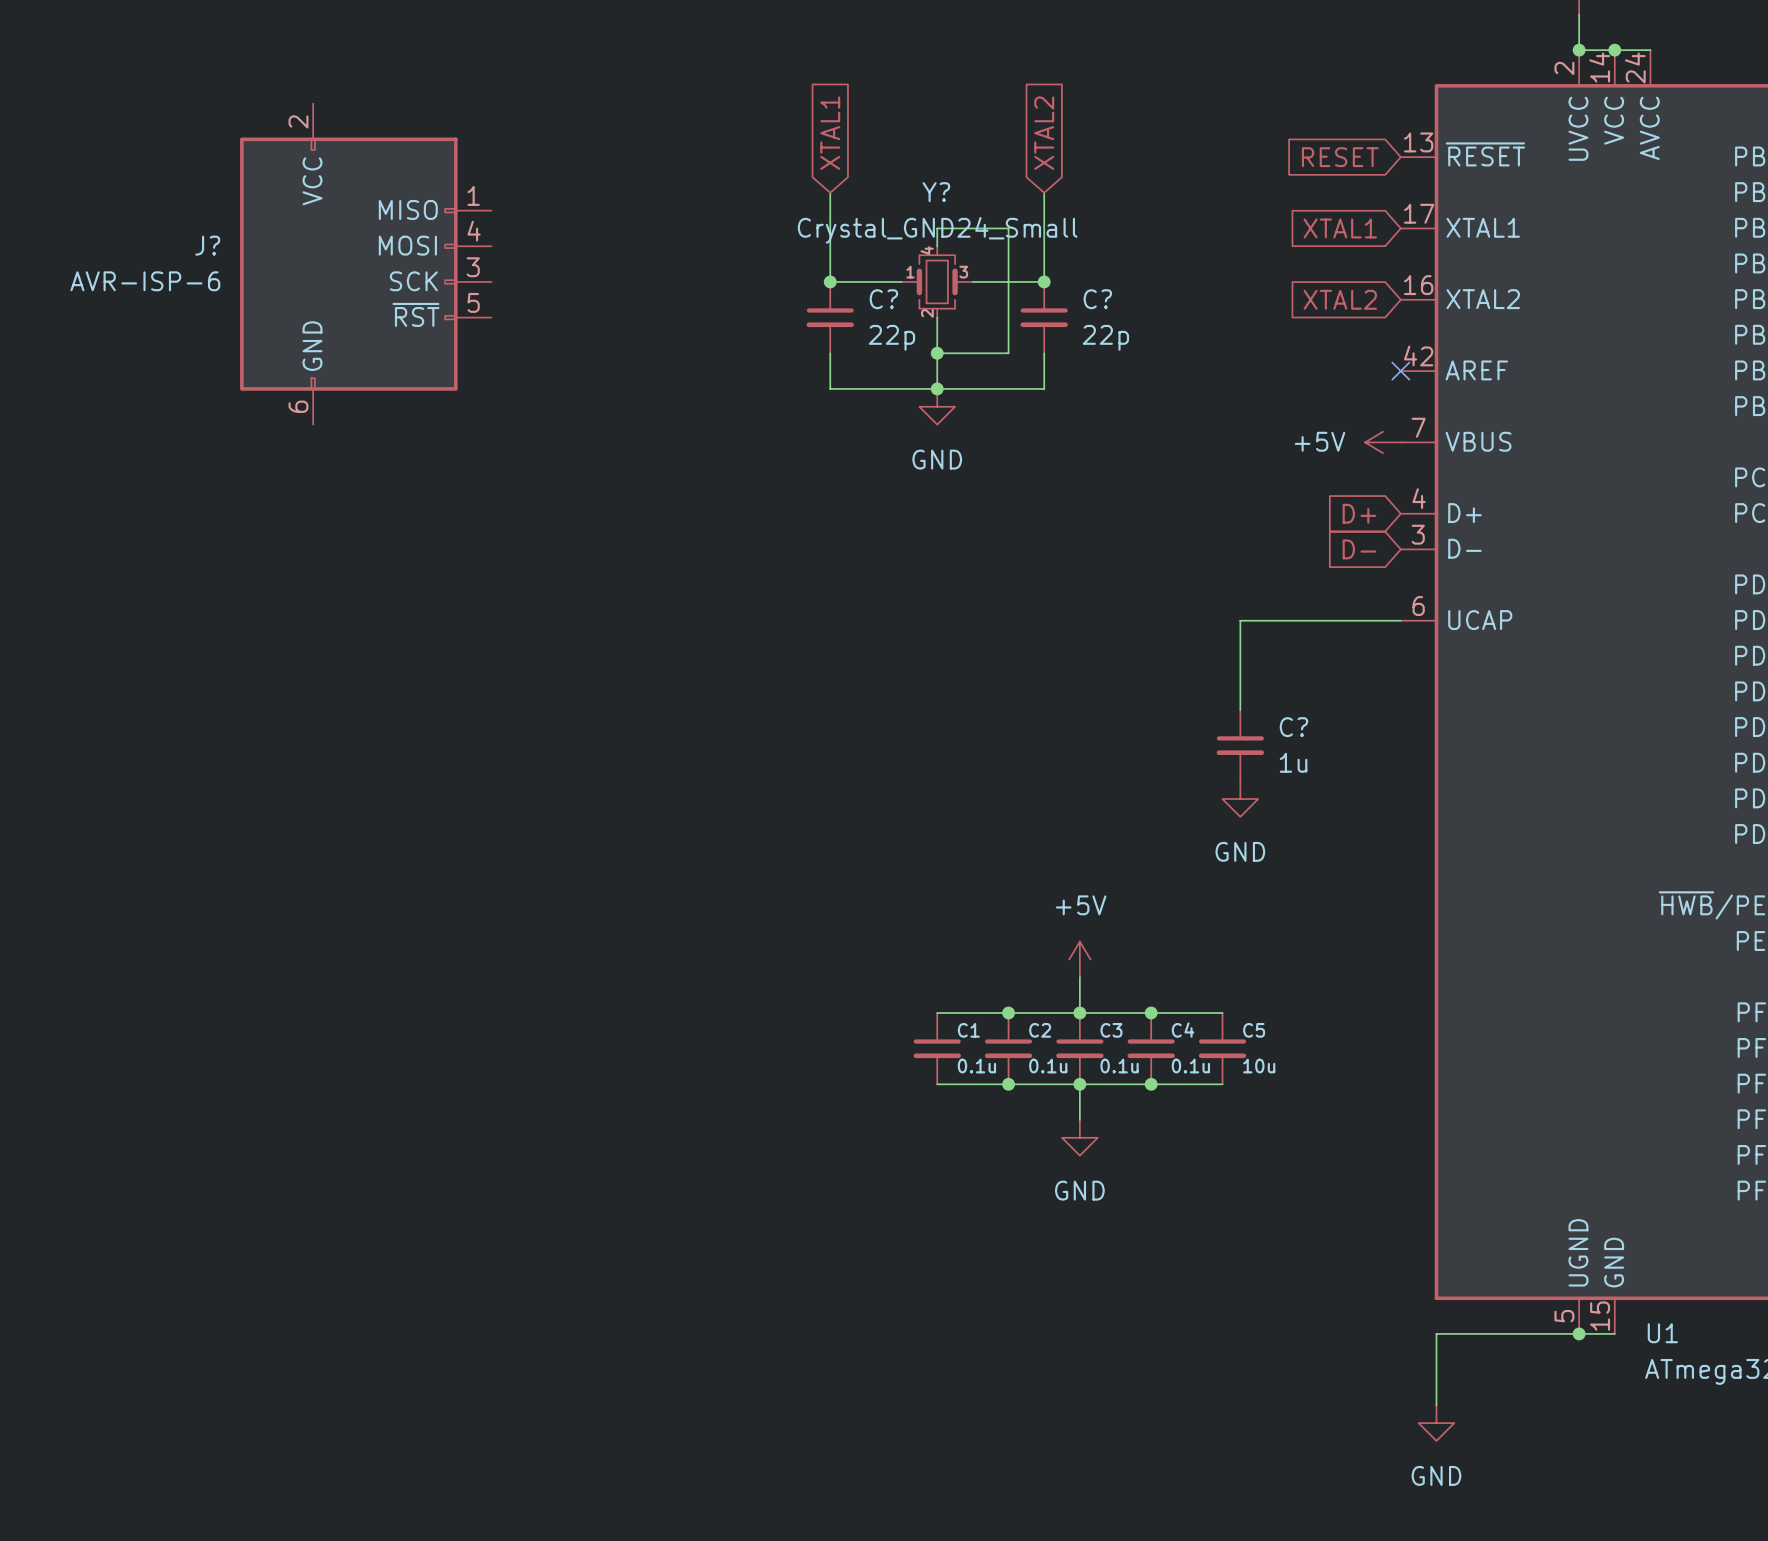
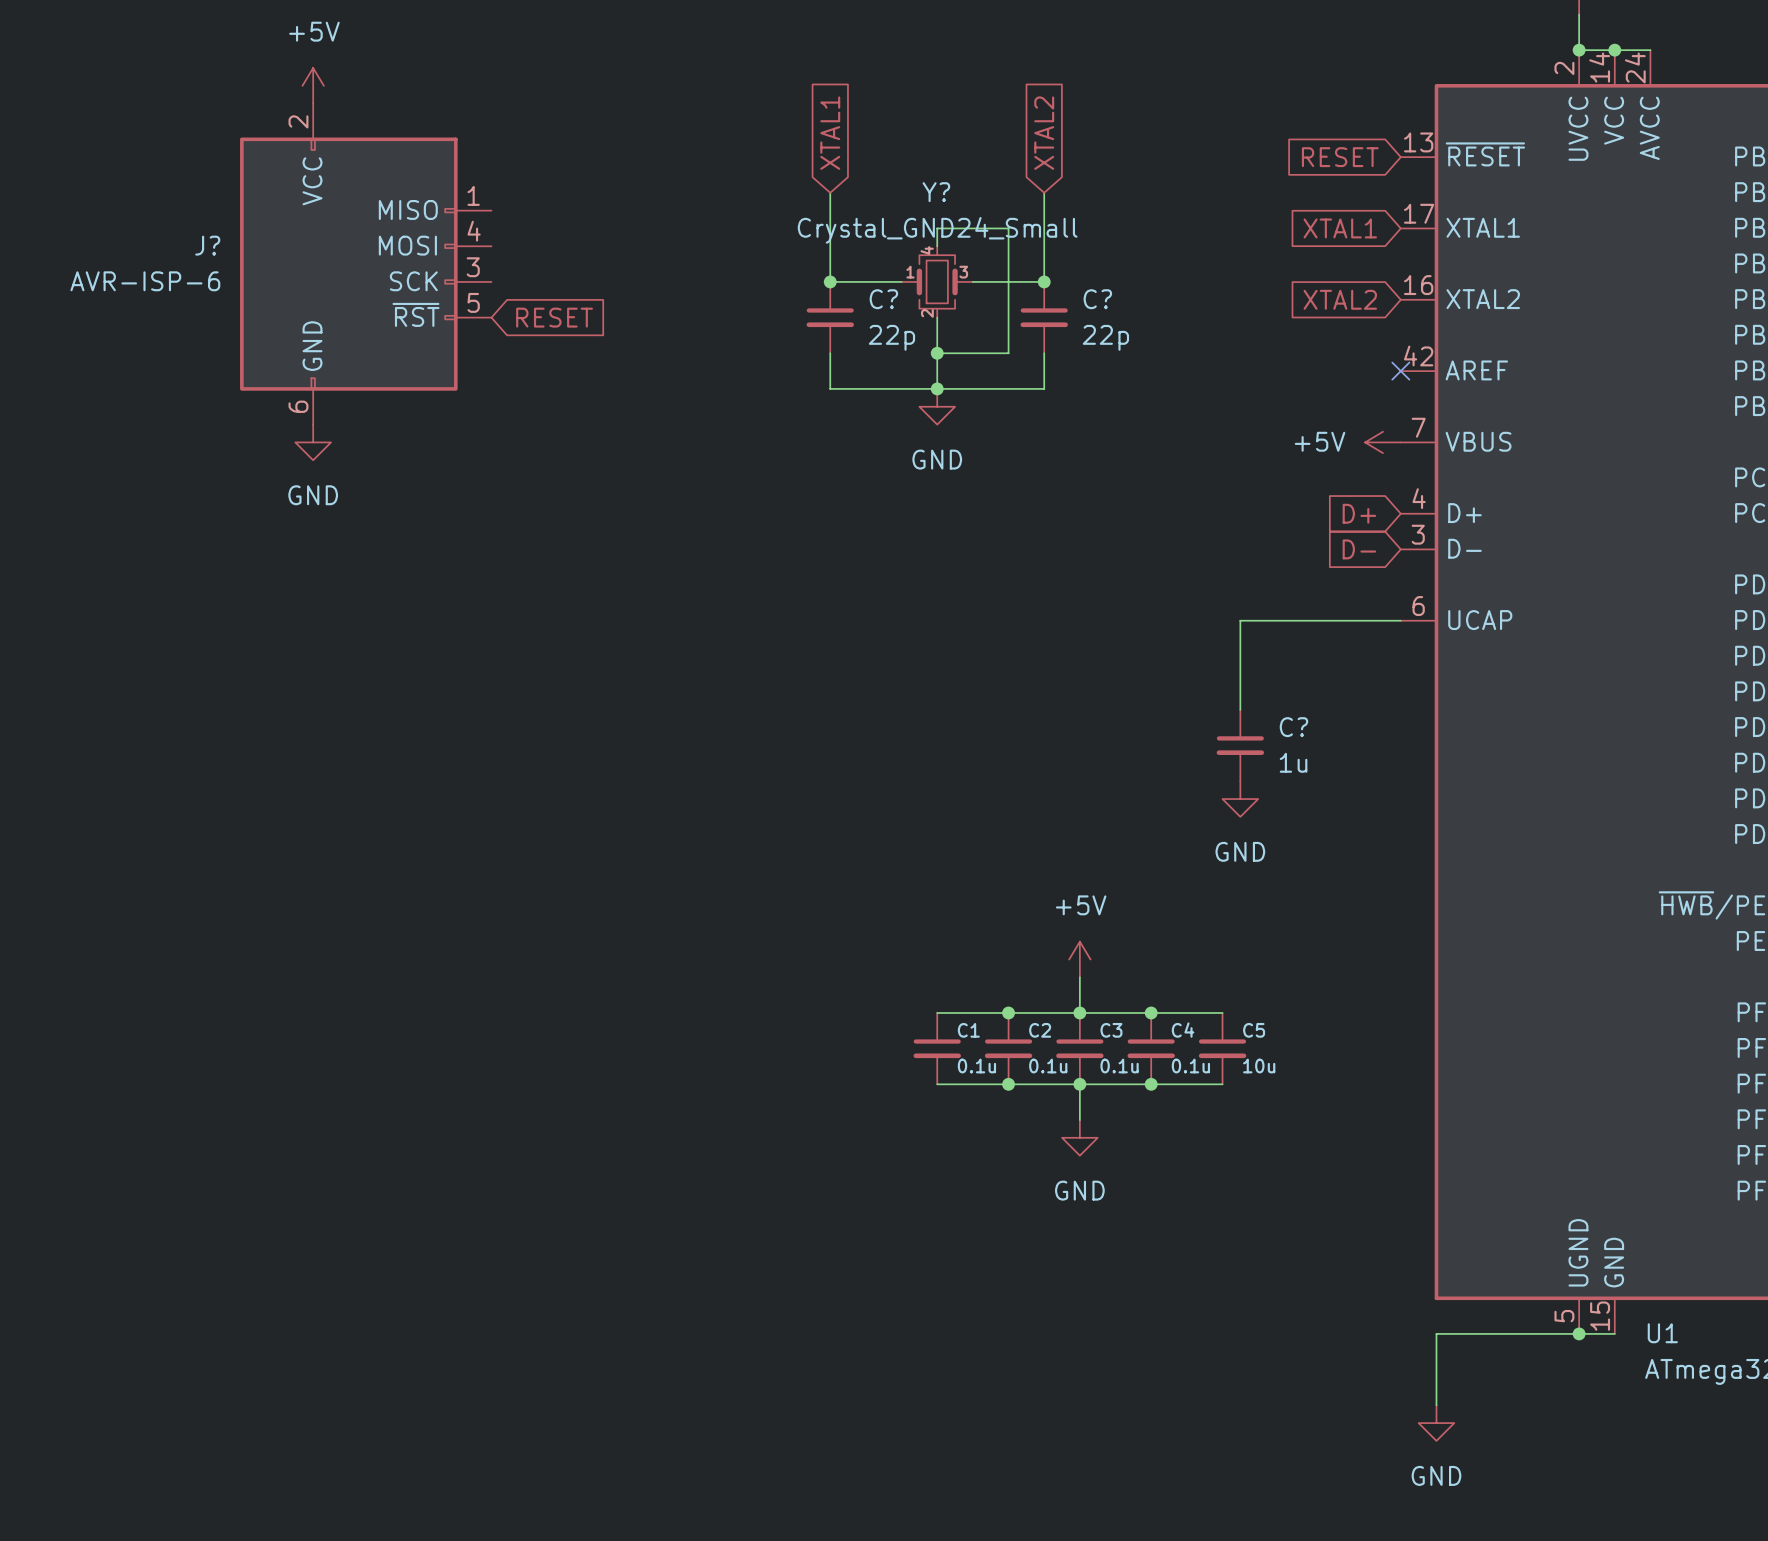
power symbol: none -> +5V (313, 85)
global label: none -> RESET (554, 317)
power symbol: none -> GND (313, 442)

